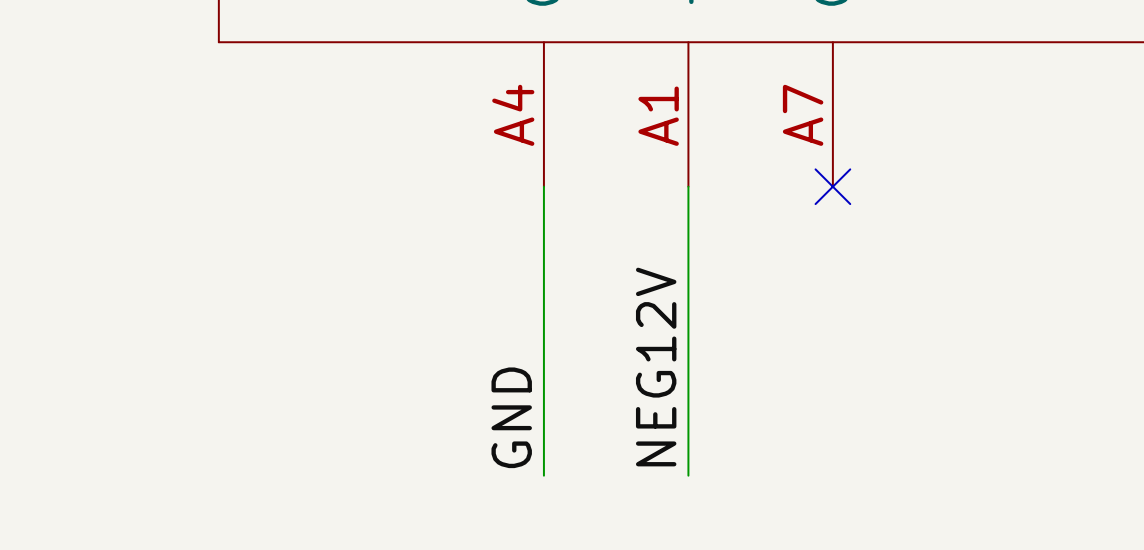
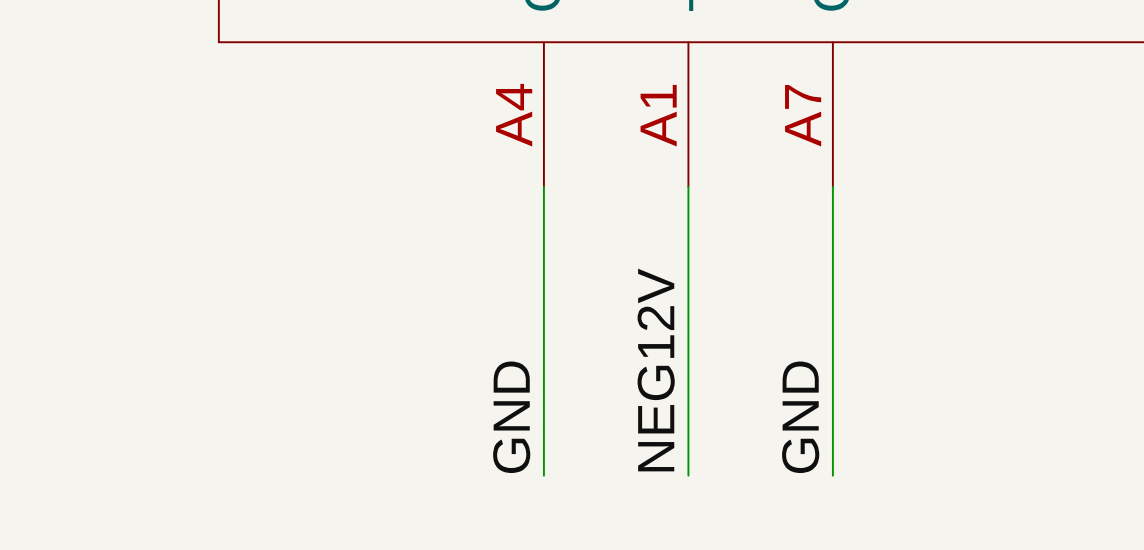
wire: none -> (832, 186) (832, 475)
no-connect mark: (832, 186) -> none
label: none -> GND (800, 417)

